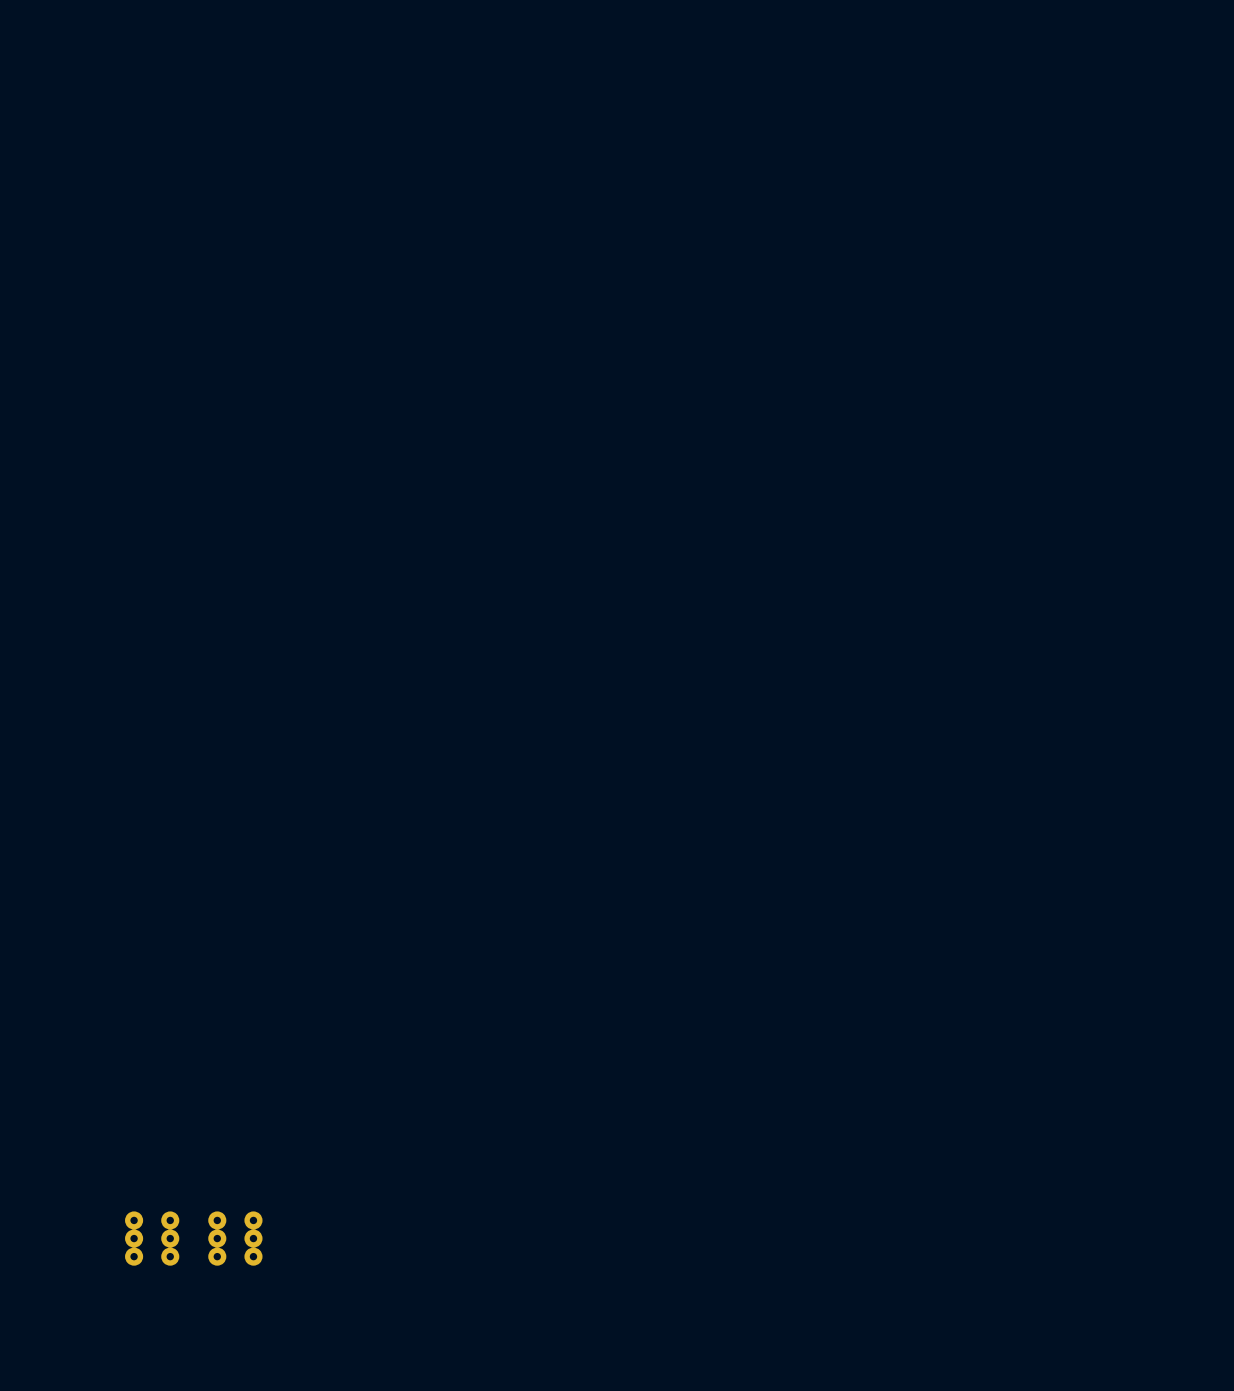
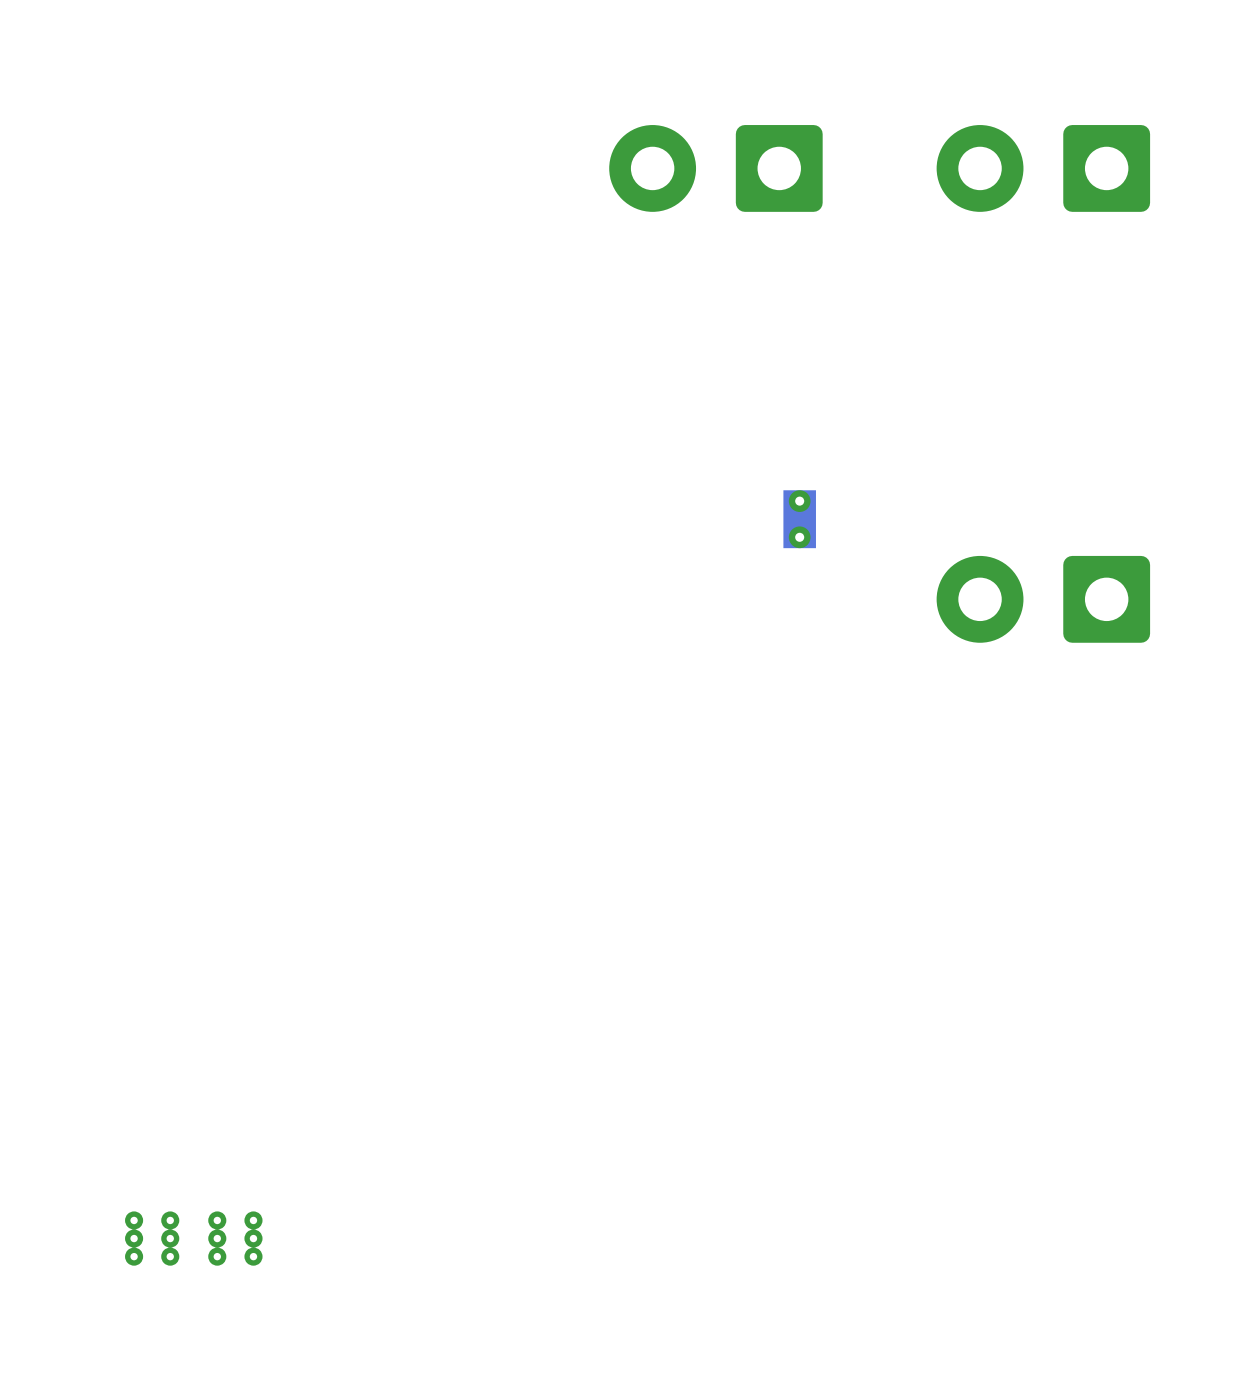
part: none -> (715, 168)
part: none -> (1043, 168)
part: none -> (799, 519)
part: none -> (1043, 599)

